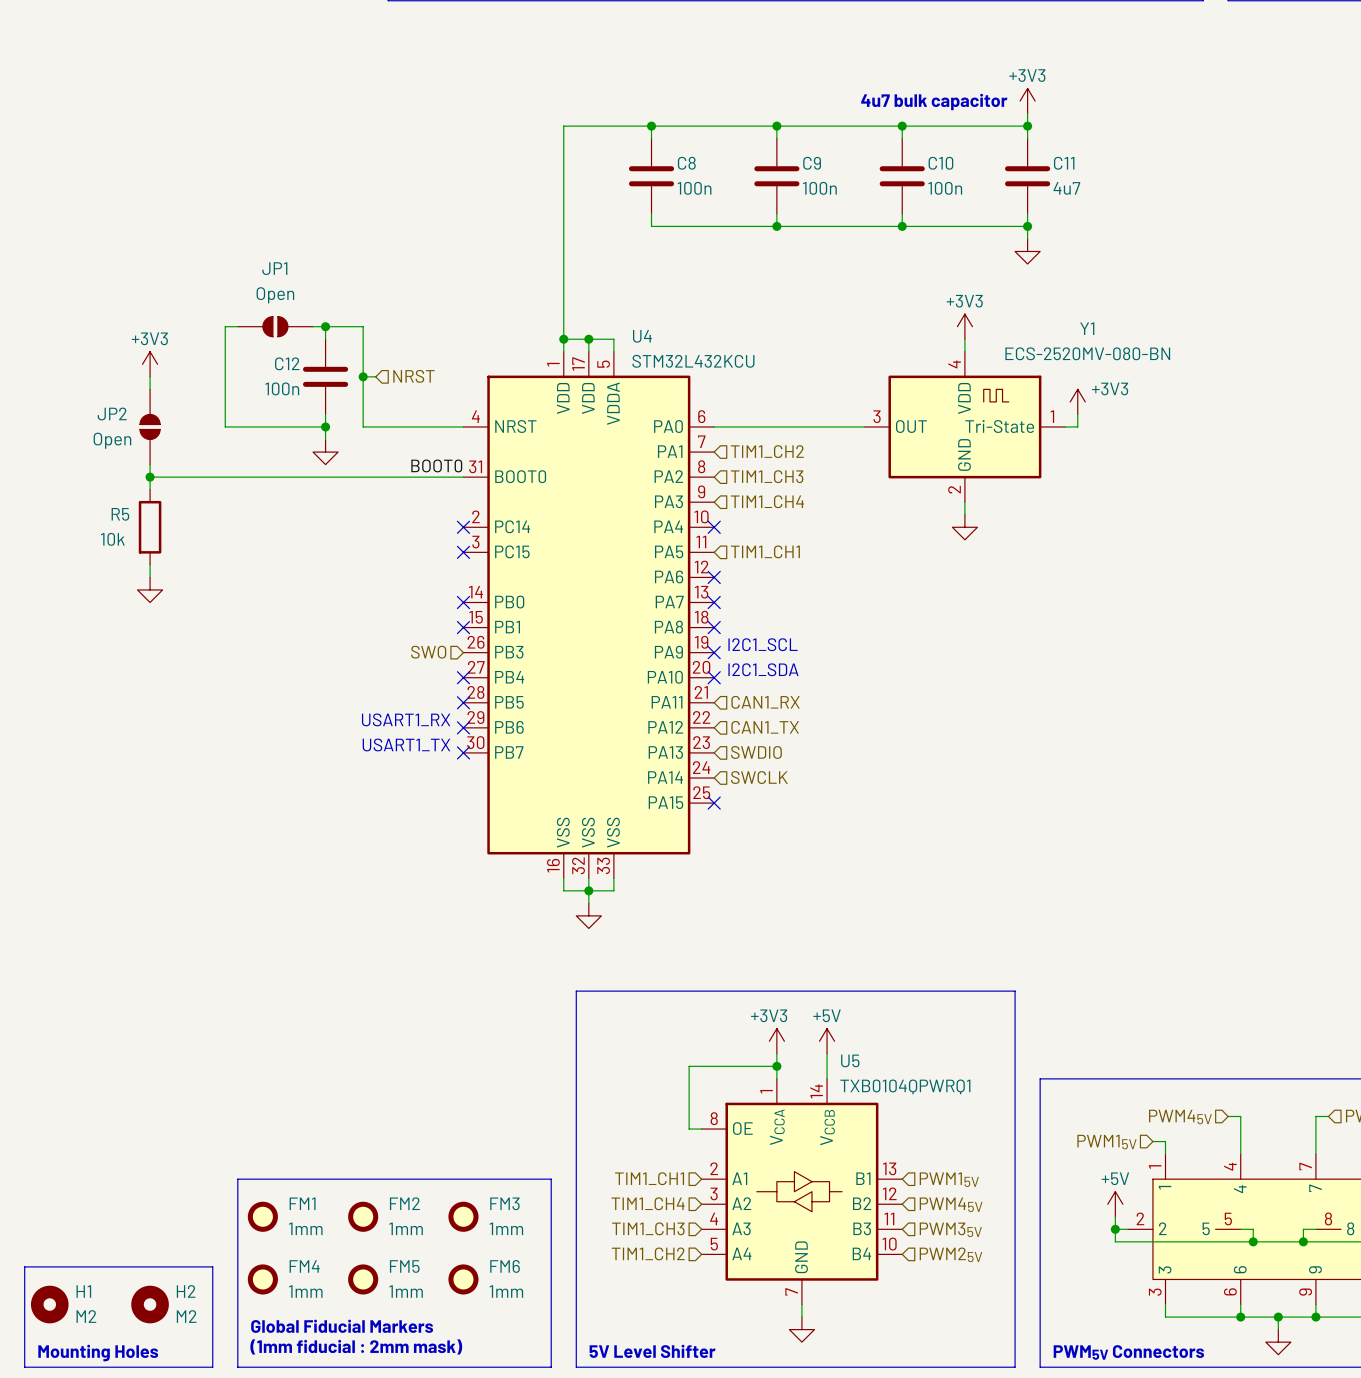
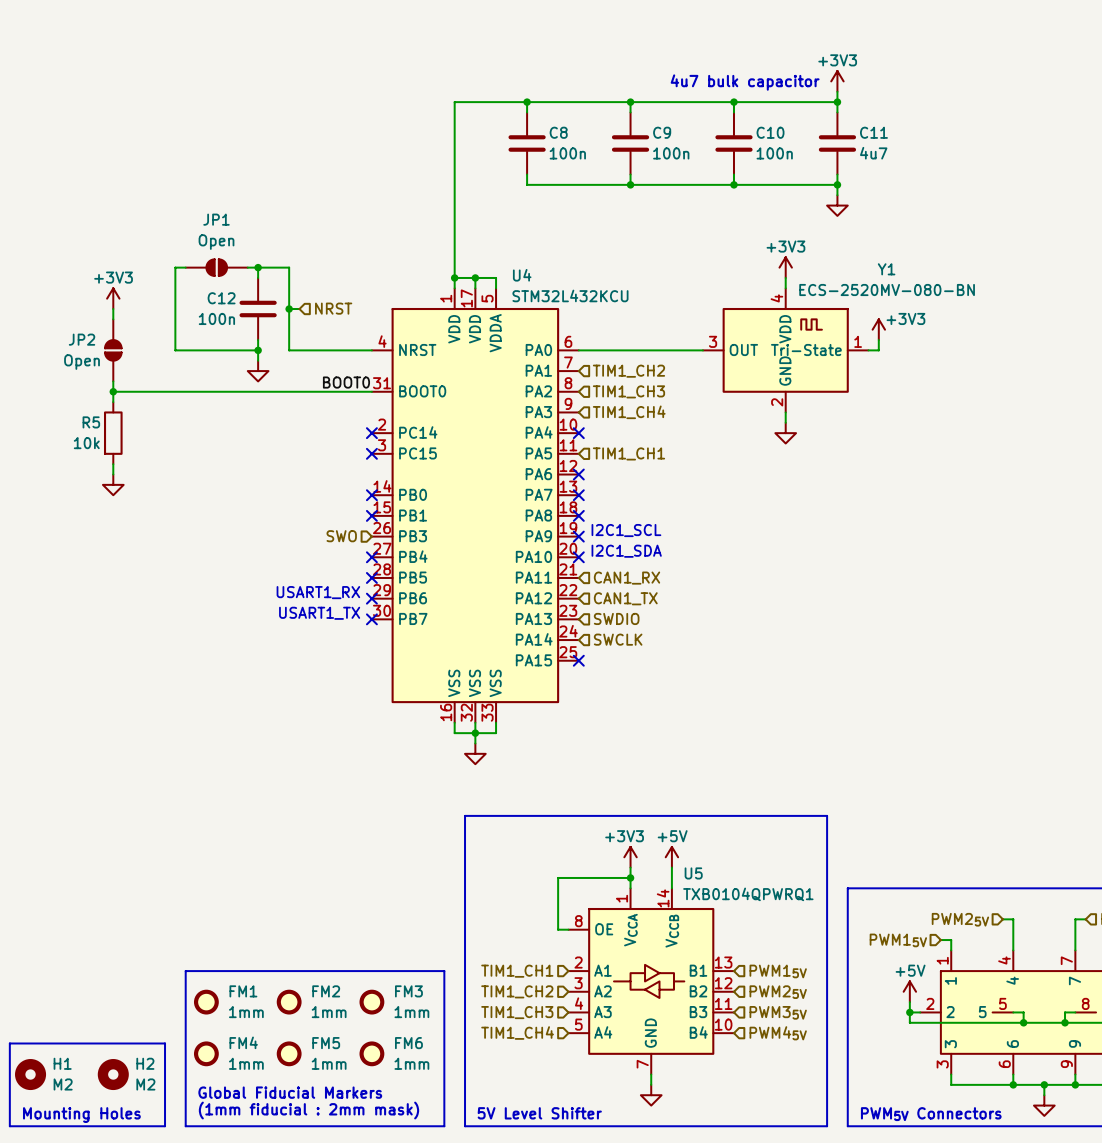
hierarchical label: PWM45V (1180, 1117) -> PWM25V (960, 919)
hierarchical label: TIM1_CH4 (648, 1203) -> TIM1_CH2 (517, 991)
hierarchical label: PWM45V (951, 1204) -> PWM25V (778, 992)
hierarchical label: TIM1_CH2 (648, 1253) -> TIM1_CH4 (517, 1033)
hierarchical label: PWM25V (950, 1254) -> PWM45V (778, 1033)

